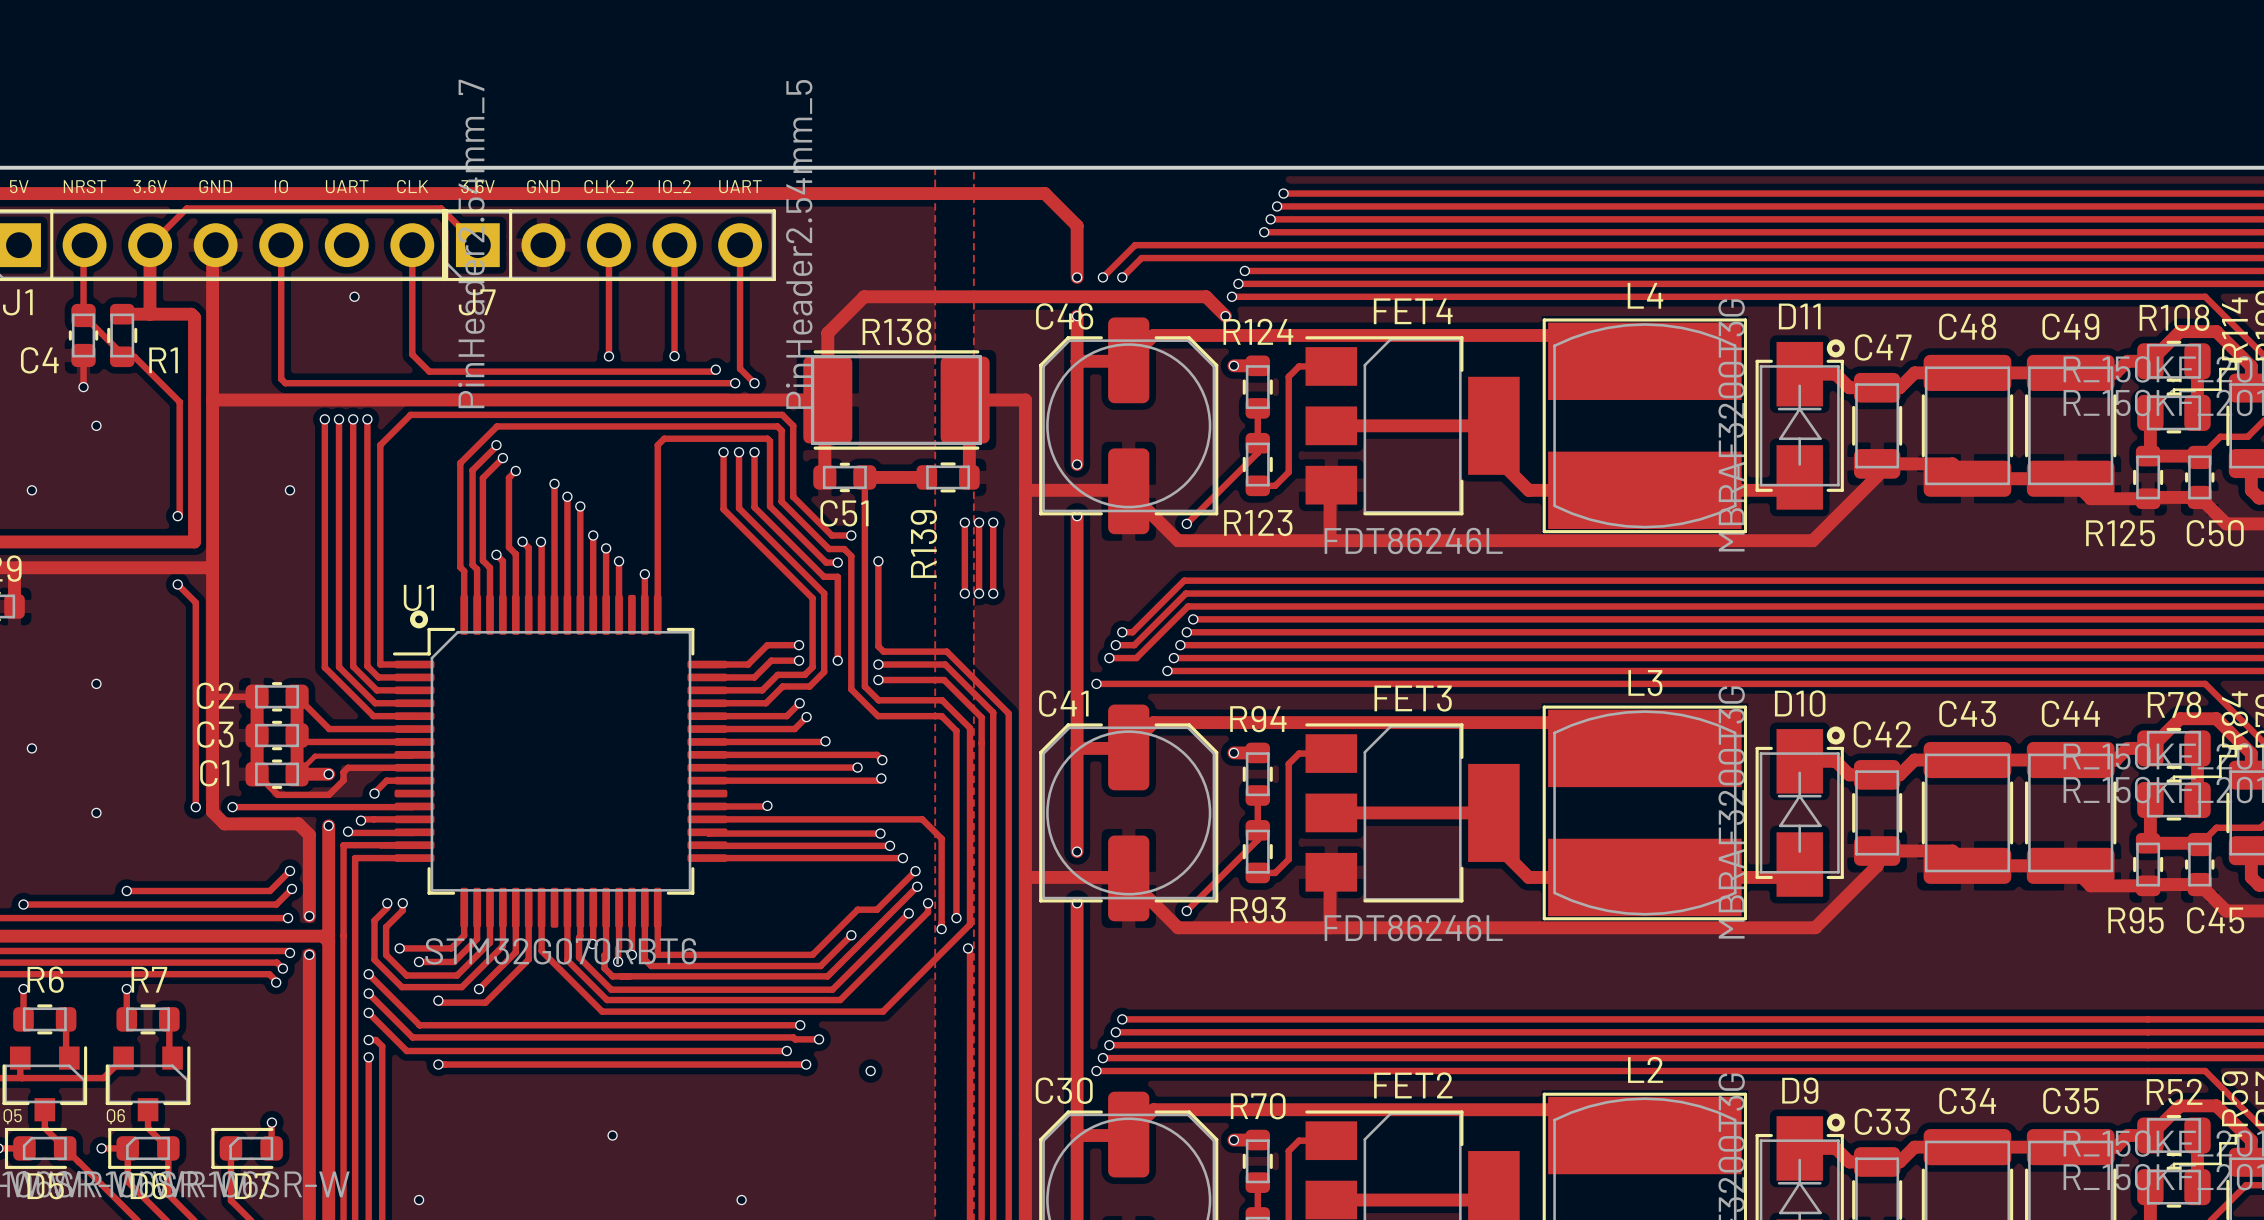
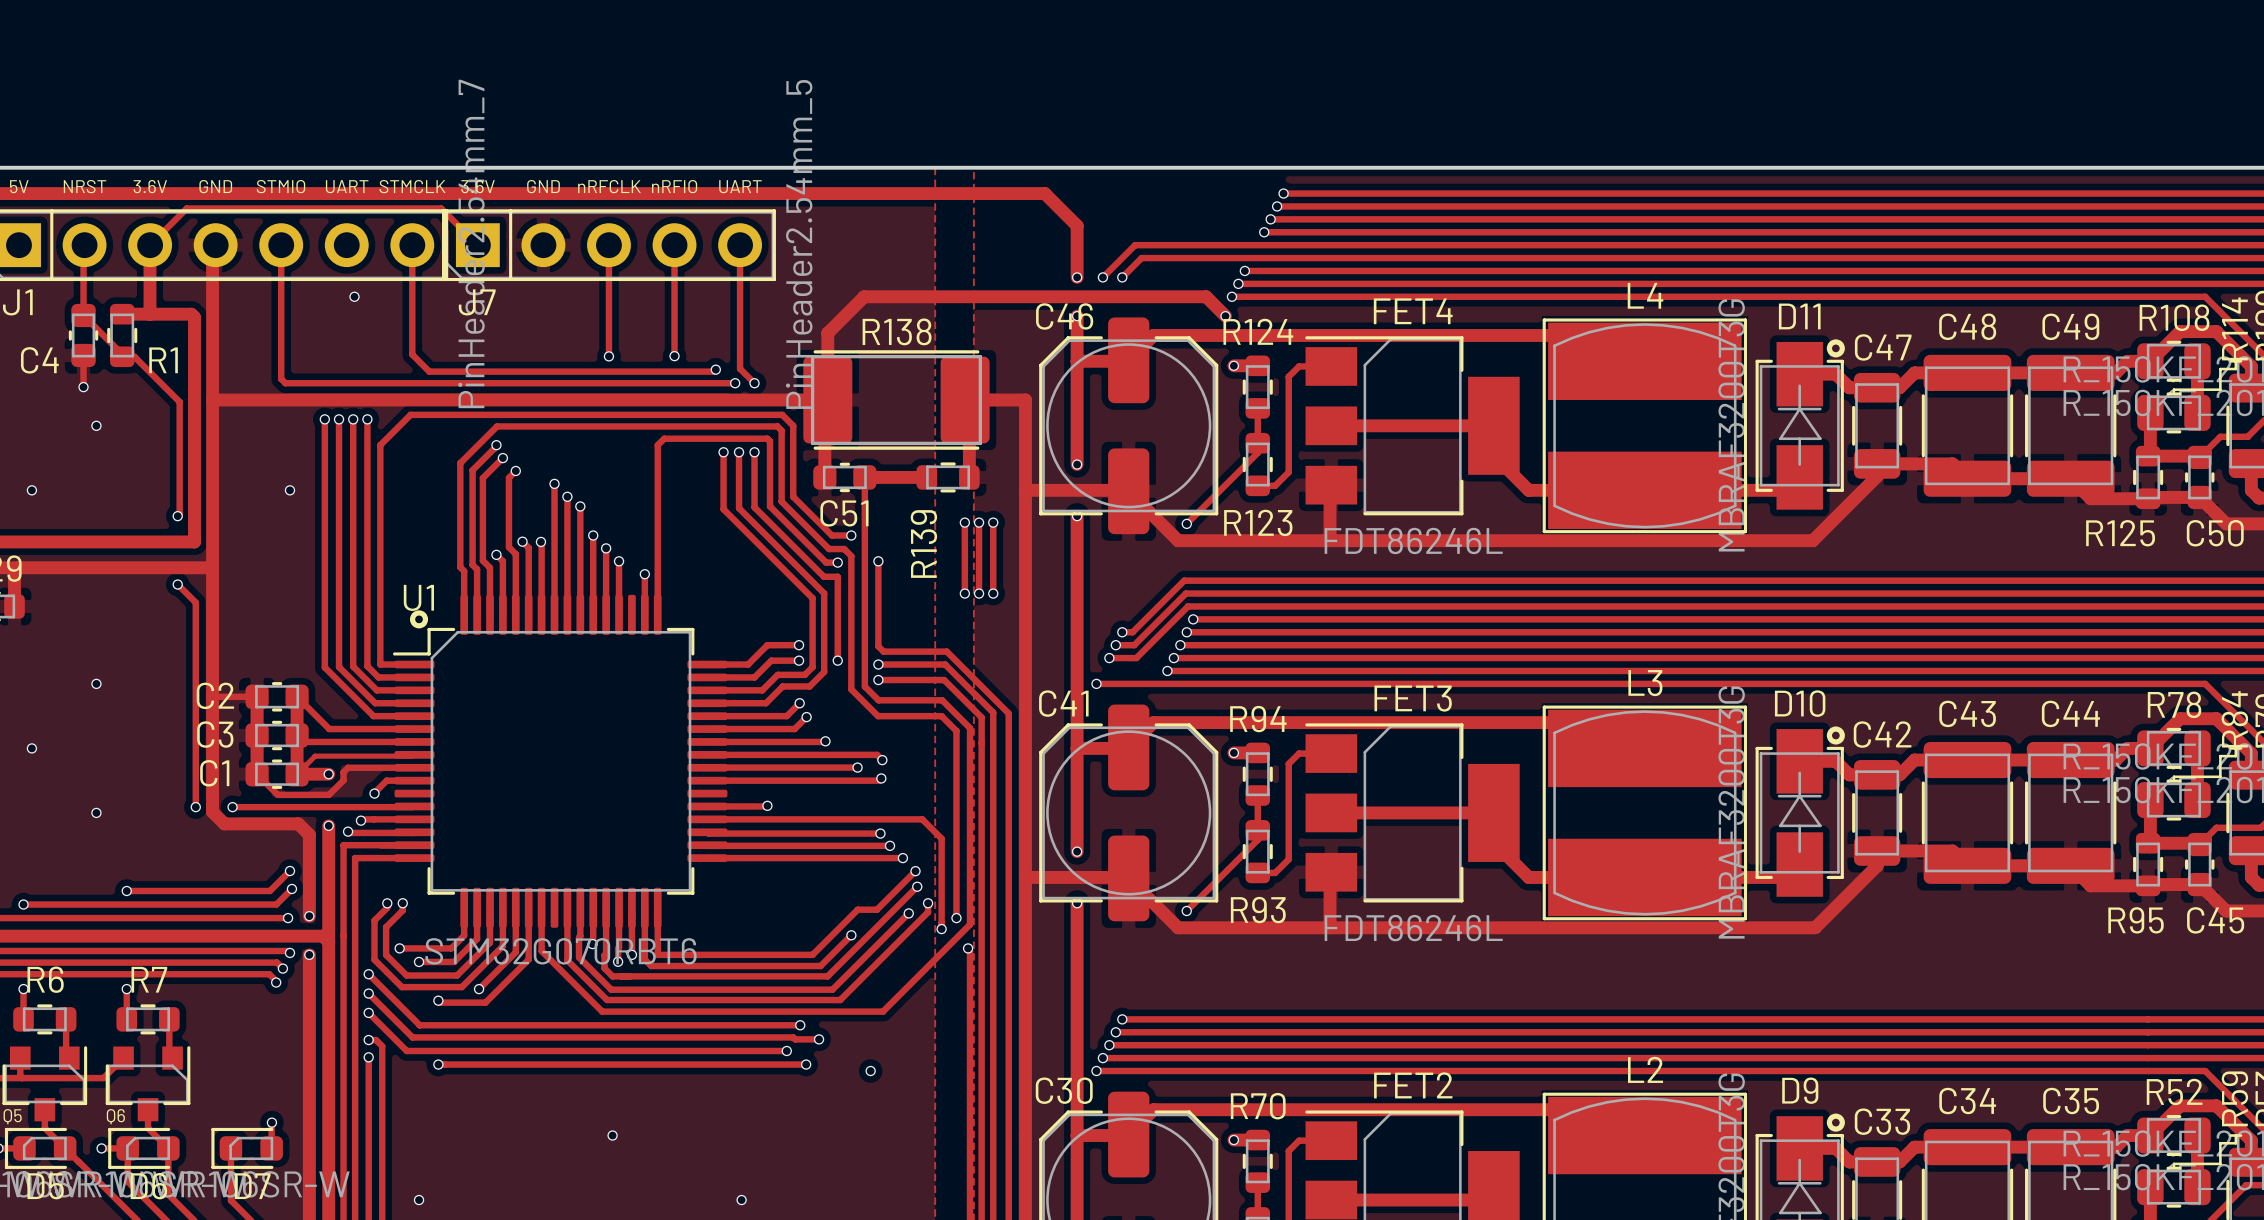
text: IO (281, 186) -> STMIO (281, 186)
text: CLK (412, 186) -> STMCLK (412, 186)
text: CLK_2 (609, 186) -> nRFCLK (609, 186)
text: IO_2 (674, 186) -> nRFIO (674, 186)

